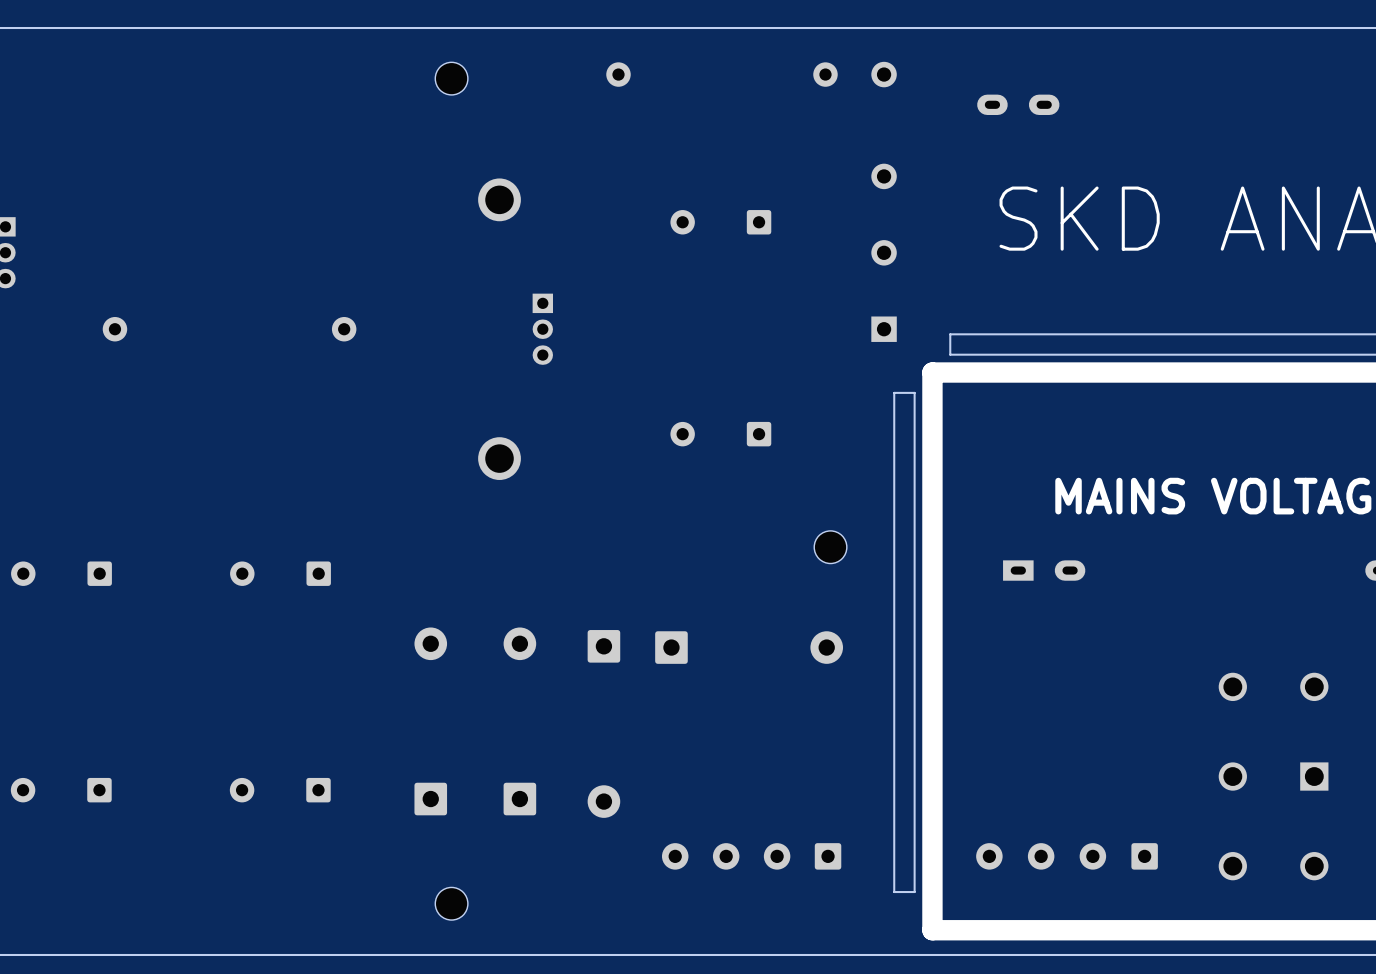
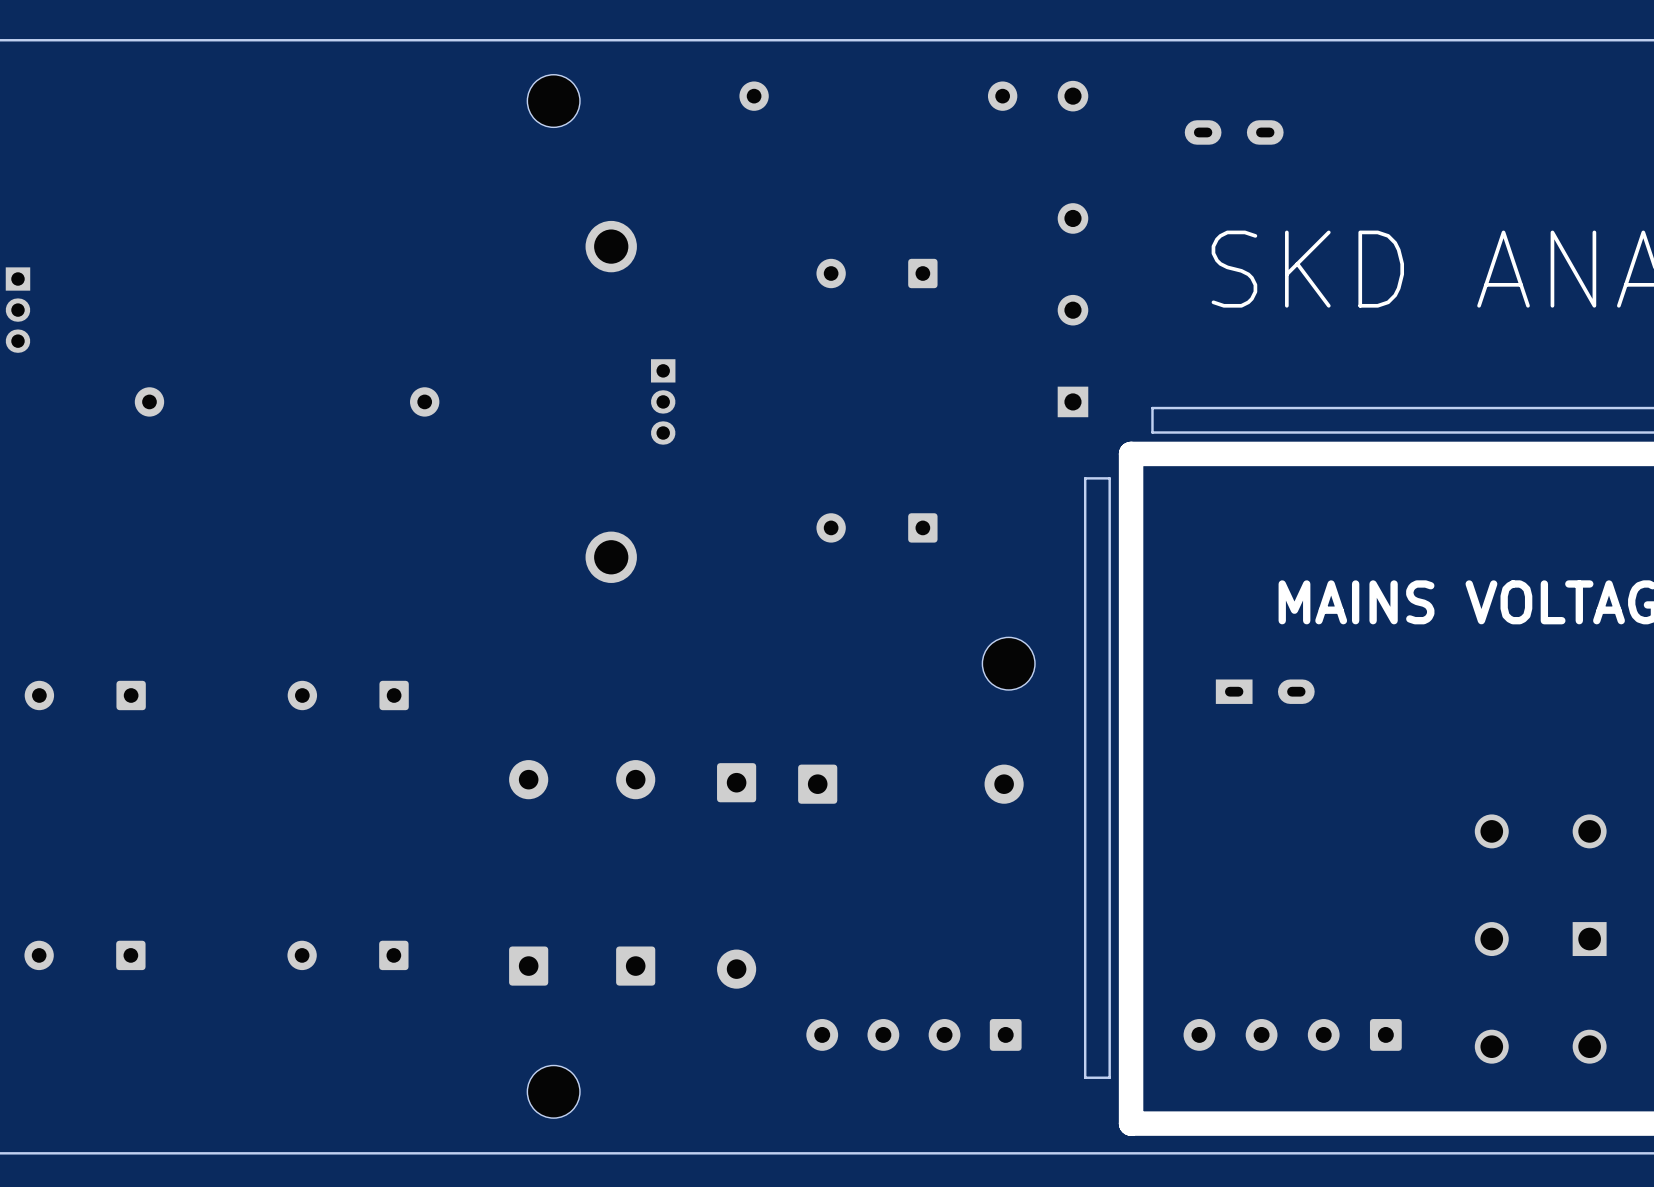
part footprint: [435, 62, 468, 95] -> [527, 74, 580, 128]
part footprint: [814, 530, 847, 564] -> [982, 637, 1035, 690]
part footprint: [435, 887, 468, 921] -> [527, 1065, 580, 1119]

